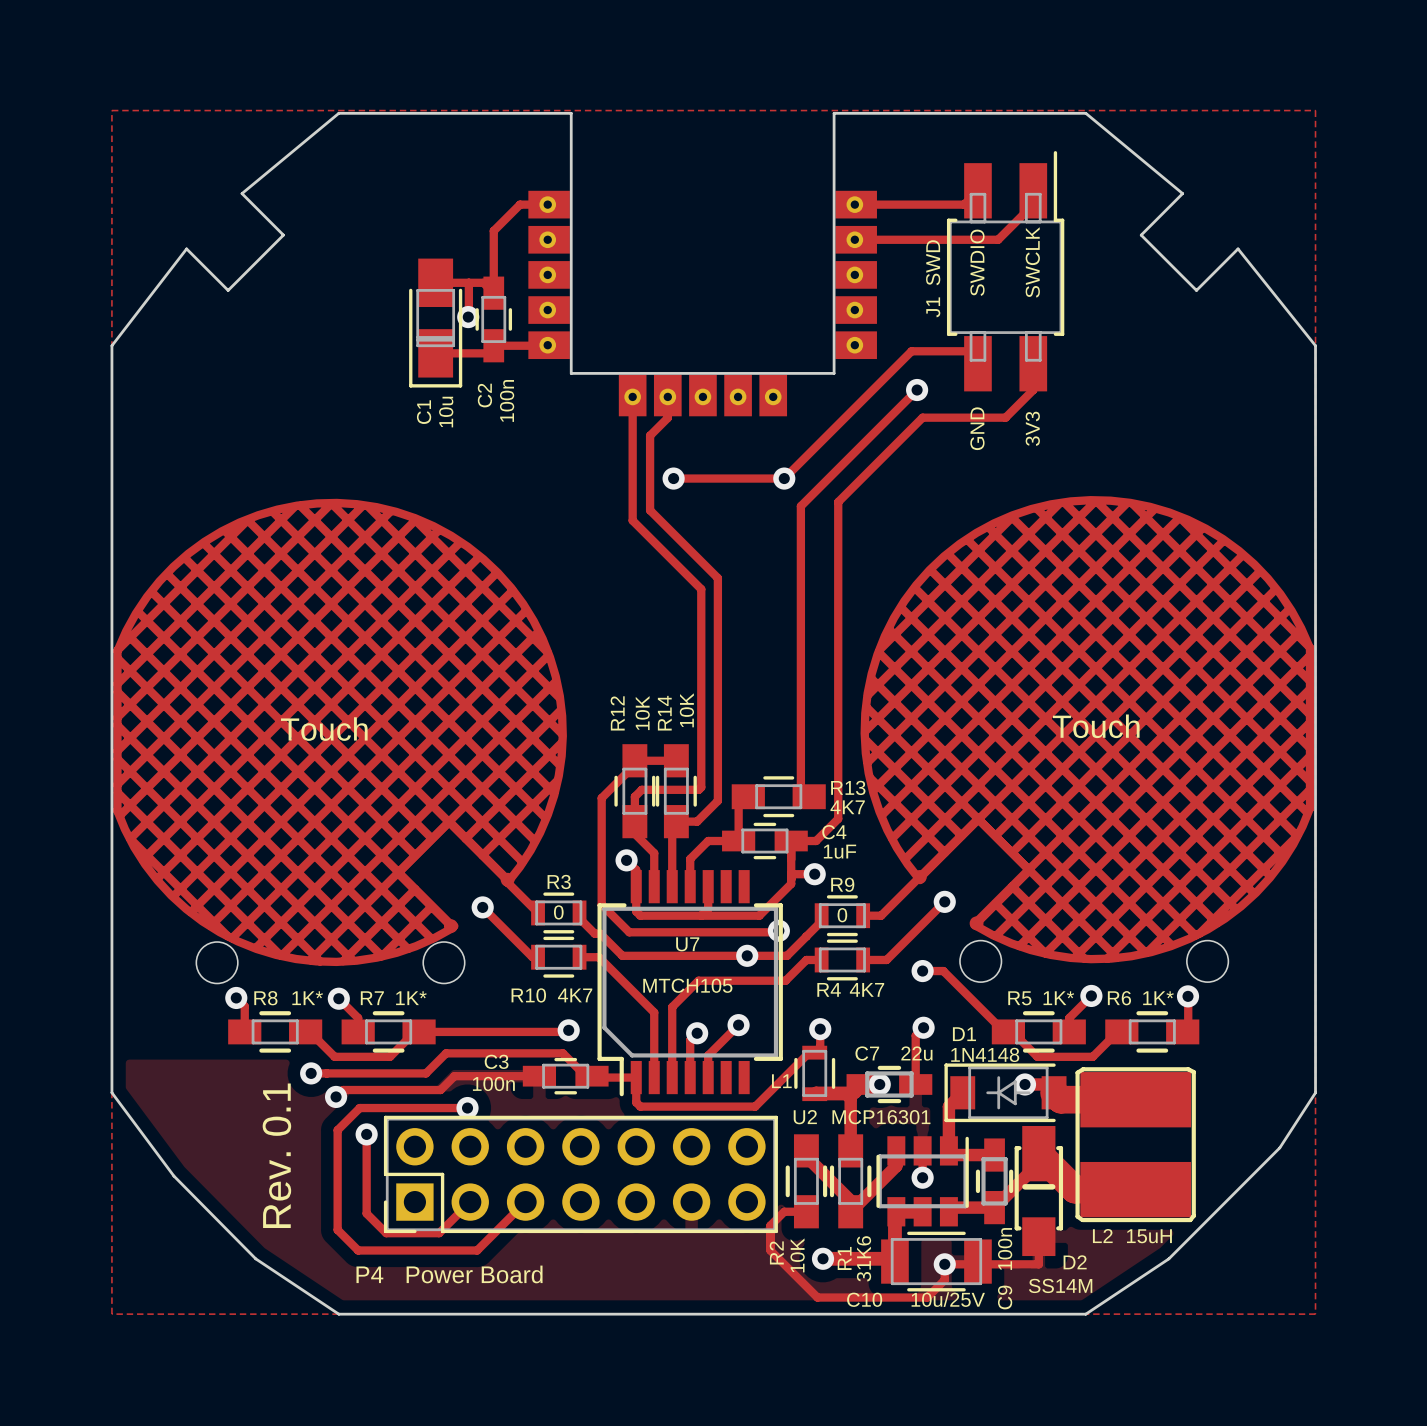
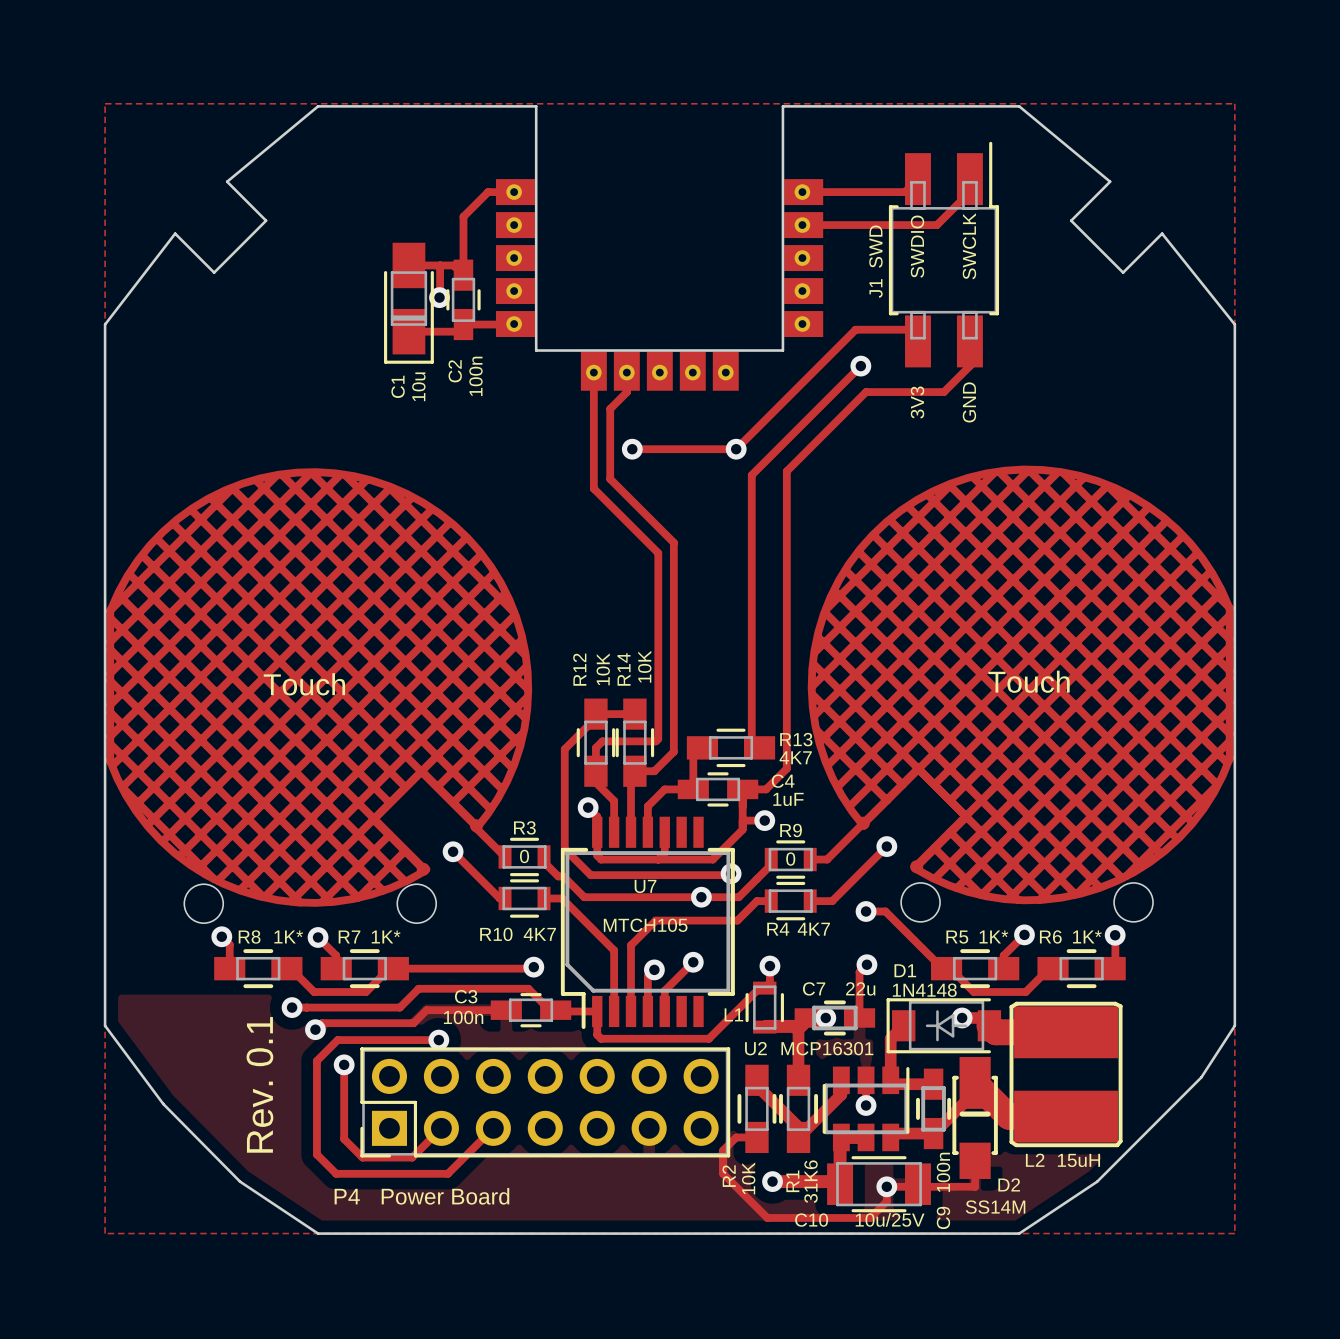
text: GND (977, 428) -> 3V3 (917, 402)
text: 3V3 (1032, 428) -> GND (969, 402)

